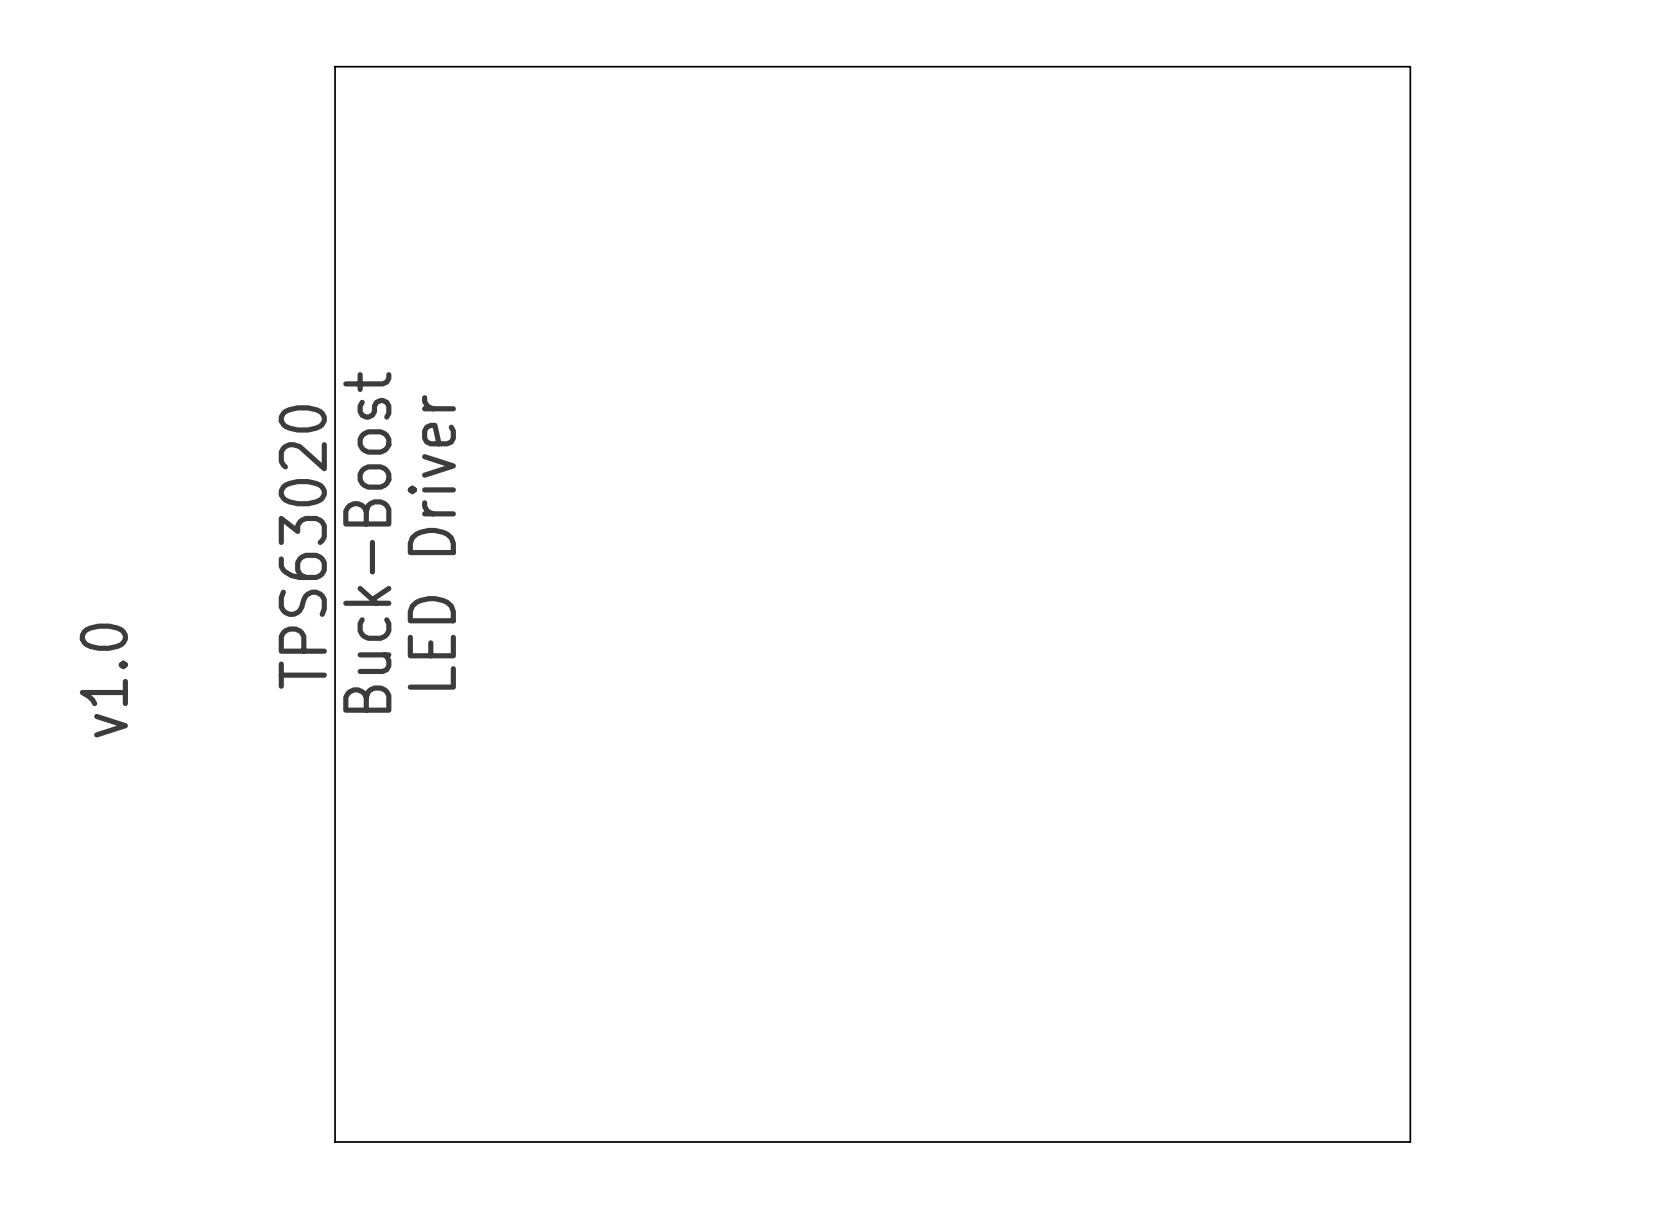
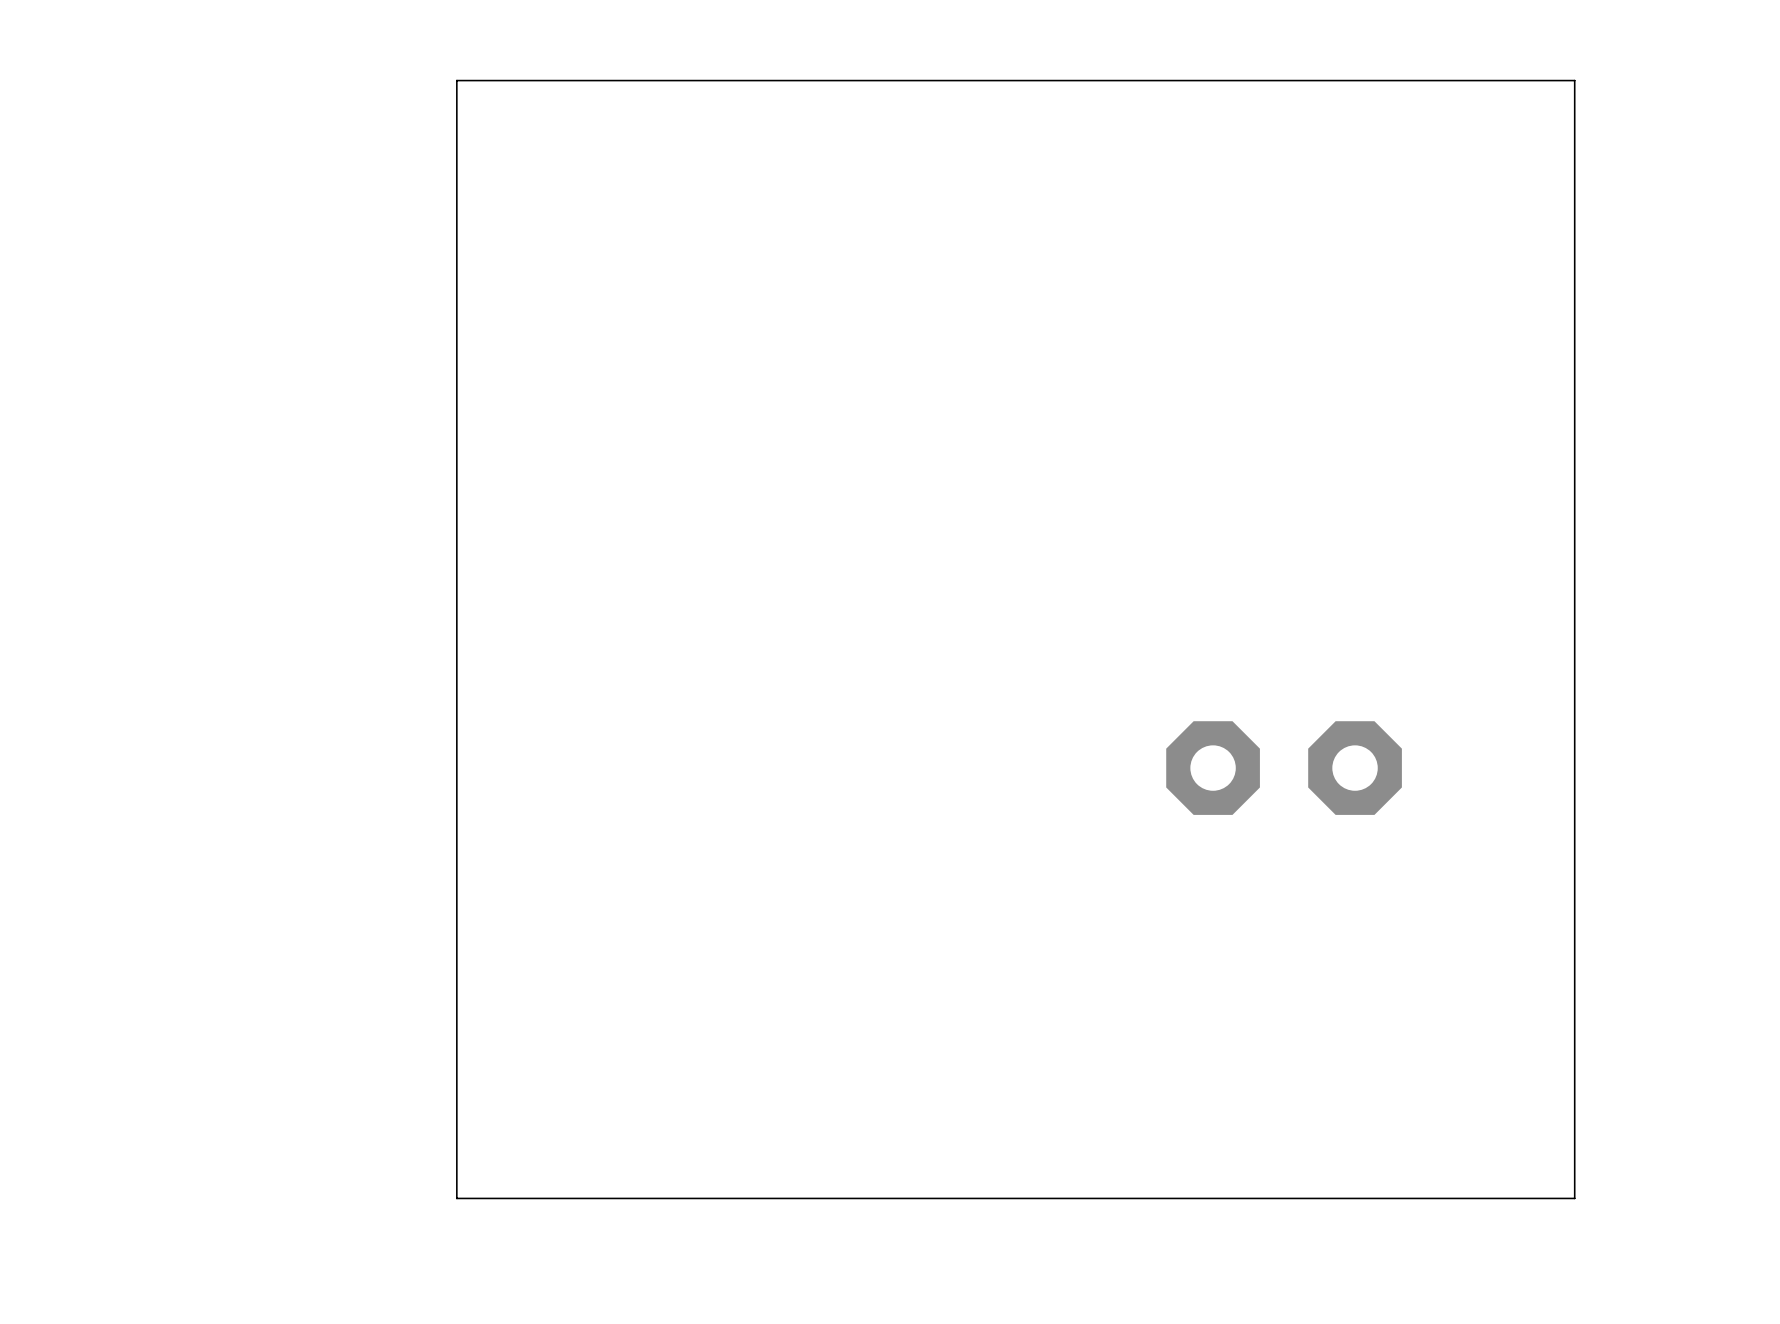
text: Buck-Boost (367, 542) -> none
text: LED Driver (431, 542) -> none
text: TPS63020 (302, 547) -> none
text: v1.0 (103, 680) -> none
part: none -> (1284, 768)

